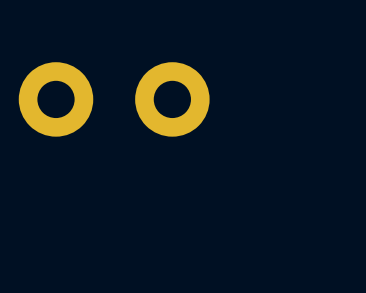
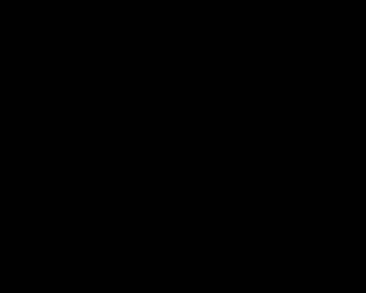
part: (114, 99) -> none

